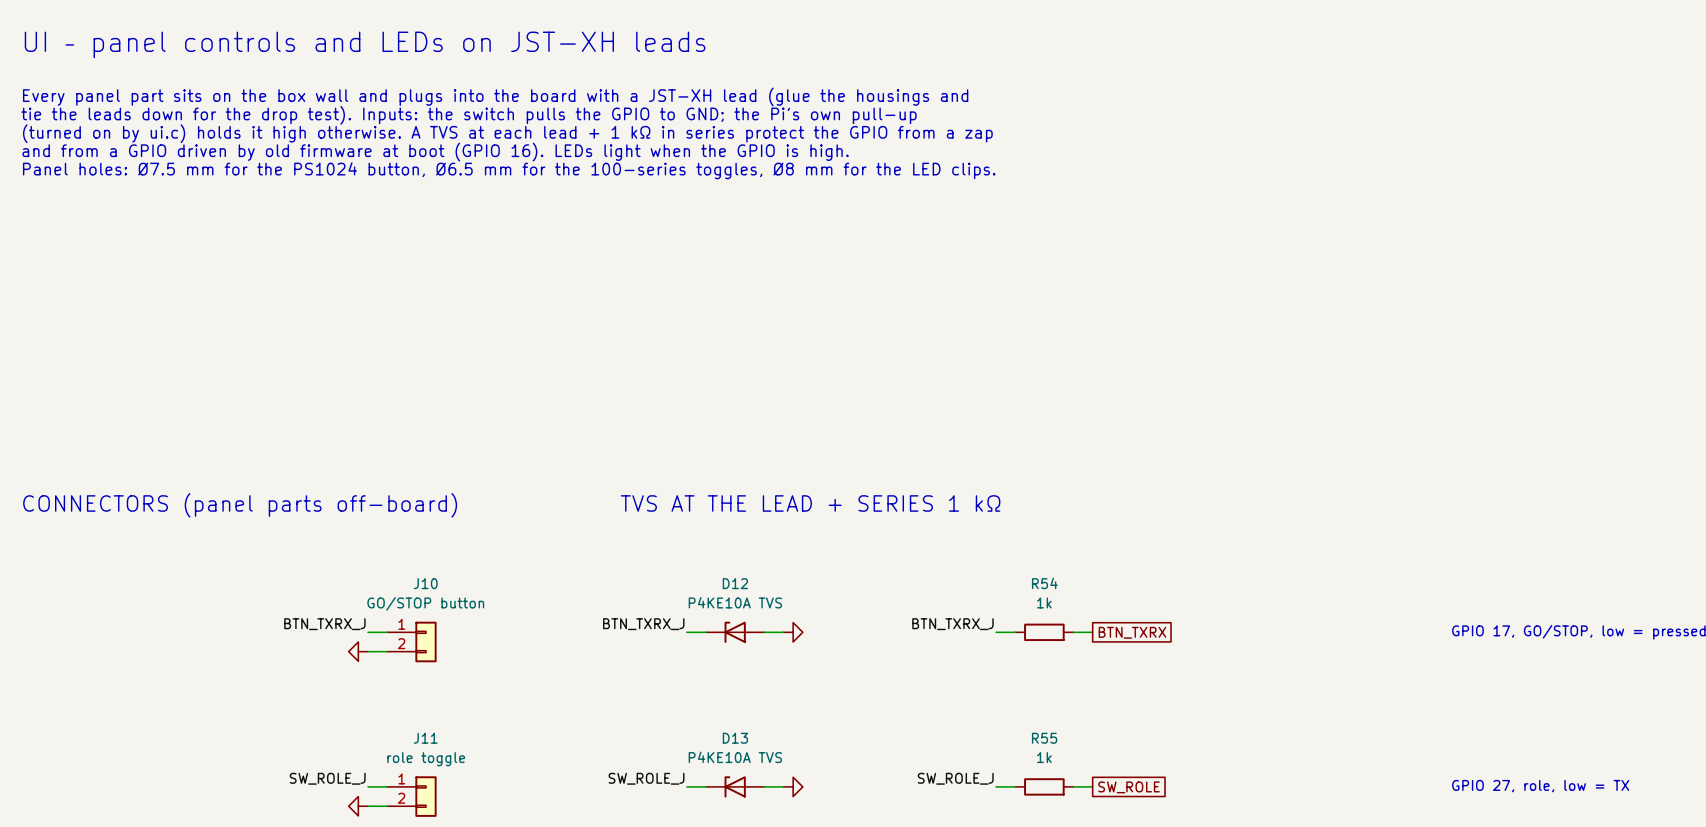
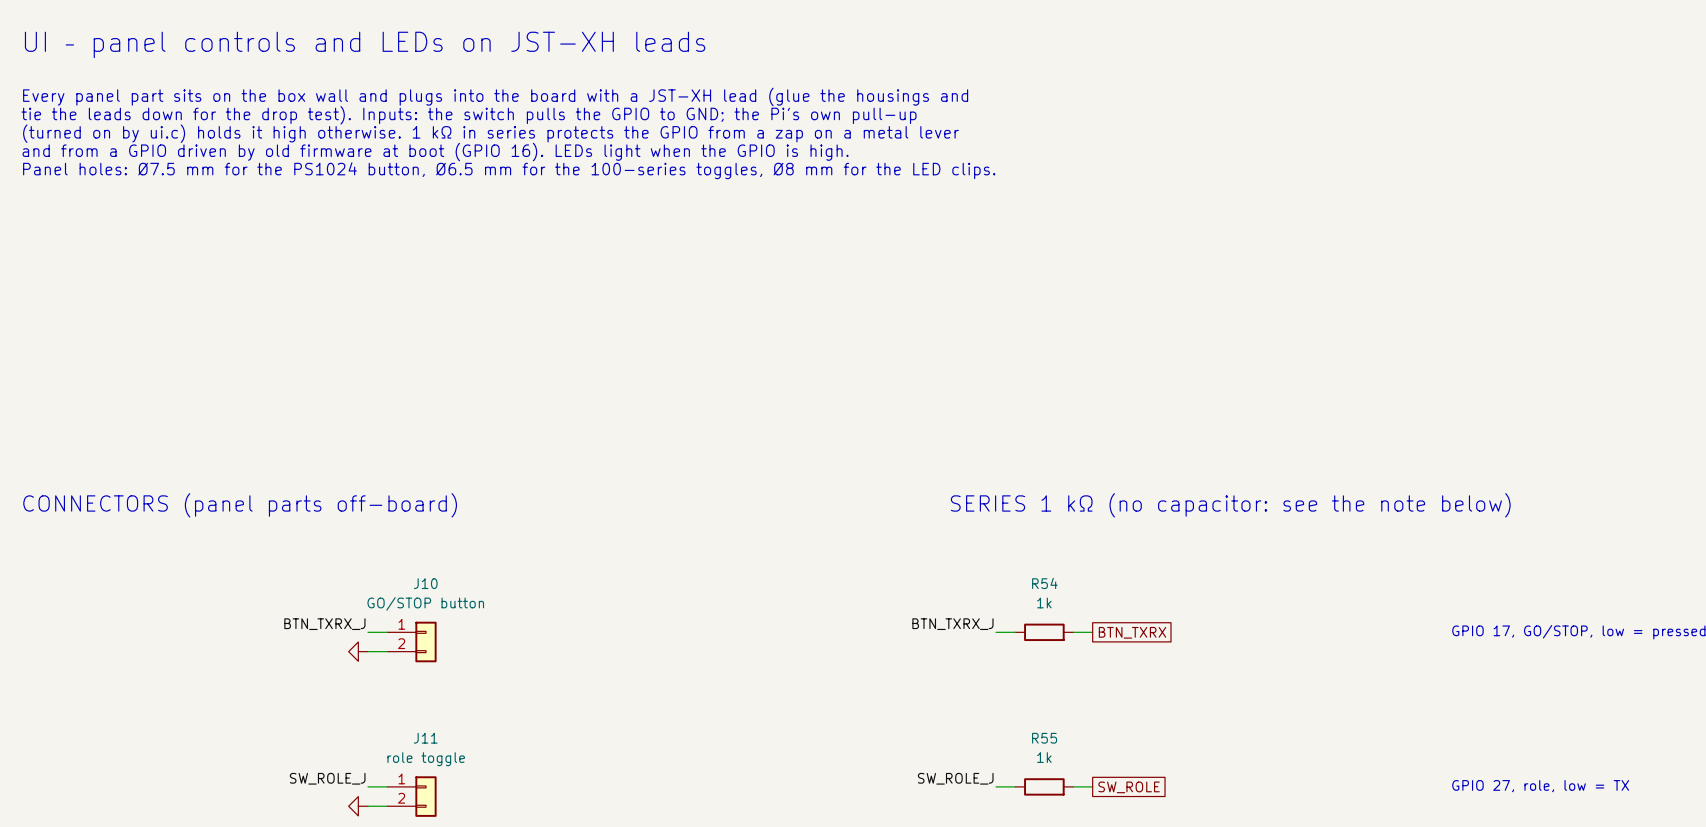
text: (turned on by ui.c) holds it high otherwise. A TVS at each lead + 1 kΩ in series protect the GPIO from a zap (507, 133) -> (turned on by ui.c) holds it high otherwise. 1 kΩ in series protects the GPIO from a zap on a metal lever (491, 133)
text: TVS AT THE LEAD + SERIES 1 kΩ (810, 503) -> none
text: none -> SERIES 1 kΩ (no capacitor: see the note below) (1230, 505)
label: BTN_TXRX_J (643, 624) -> none
wire: (686, 632) (706, 632) -> none
D12: P4KE10A TVS (735, 632) -> none
wire: (764, 632) (783, 632) -> none
power symbol: (793, 632) -> none
label: SW_ROLE_J (646, 778) -> none
wire: (686, 786) (706, 786) -> none
D13: P4KE10A TVS (735, 786) -> none
wire: (764, 786) (783, 786) -> none
power symbol: (793, 786) -> none

